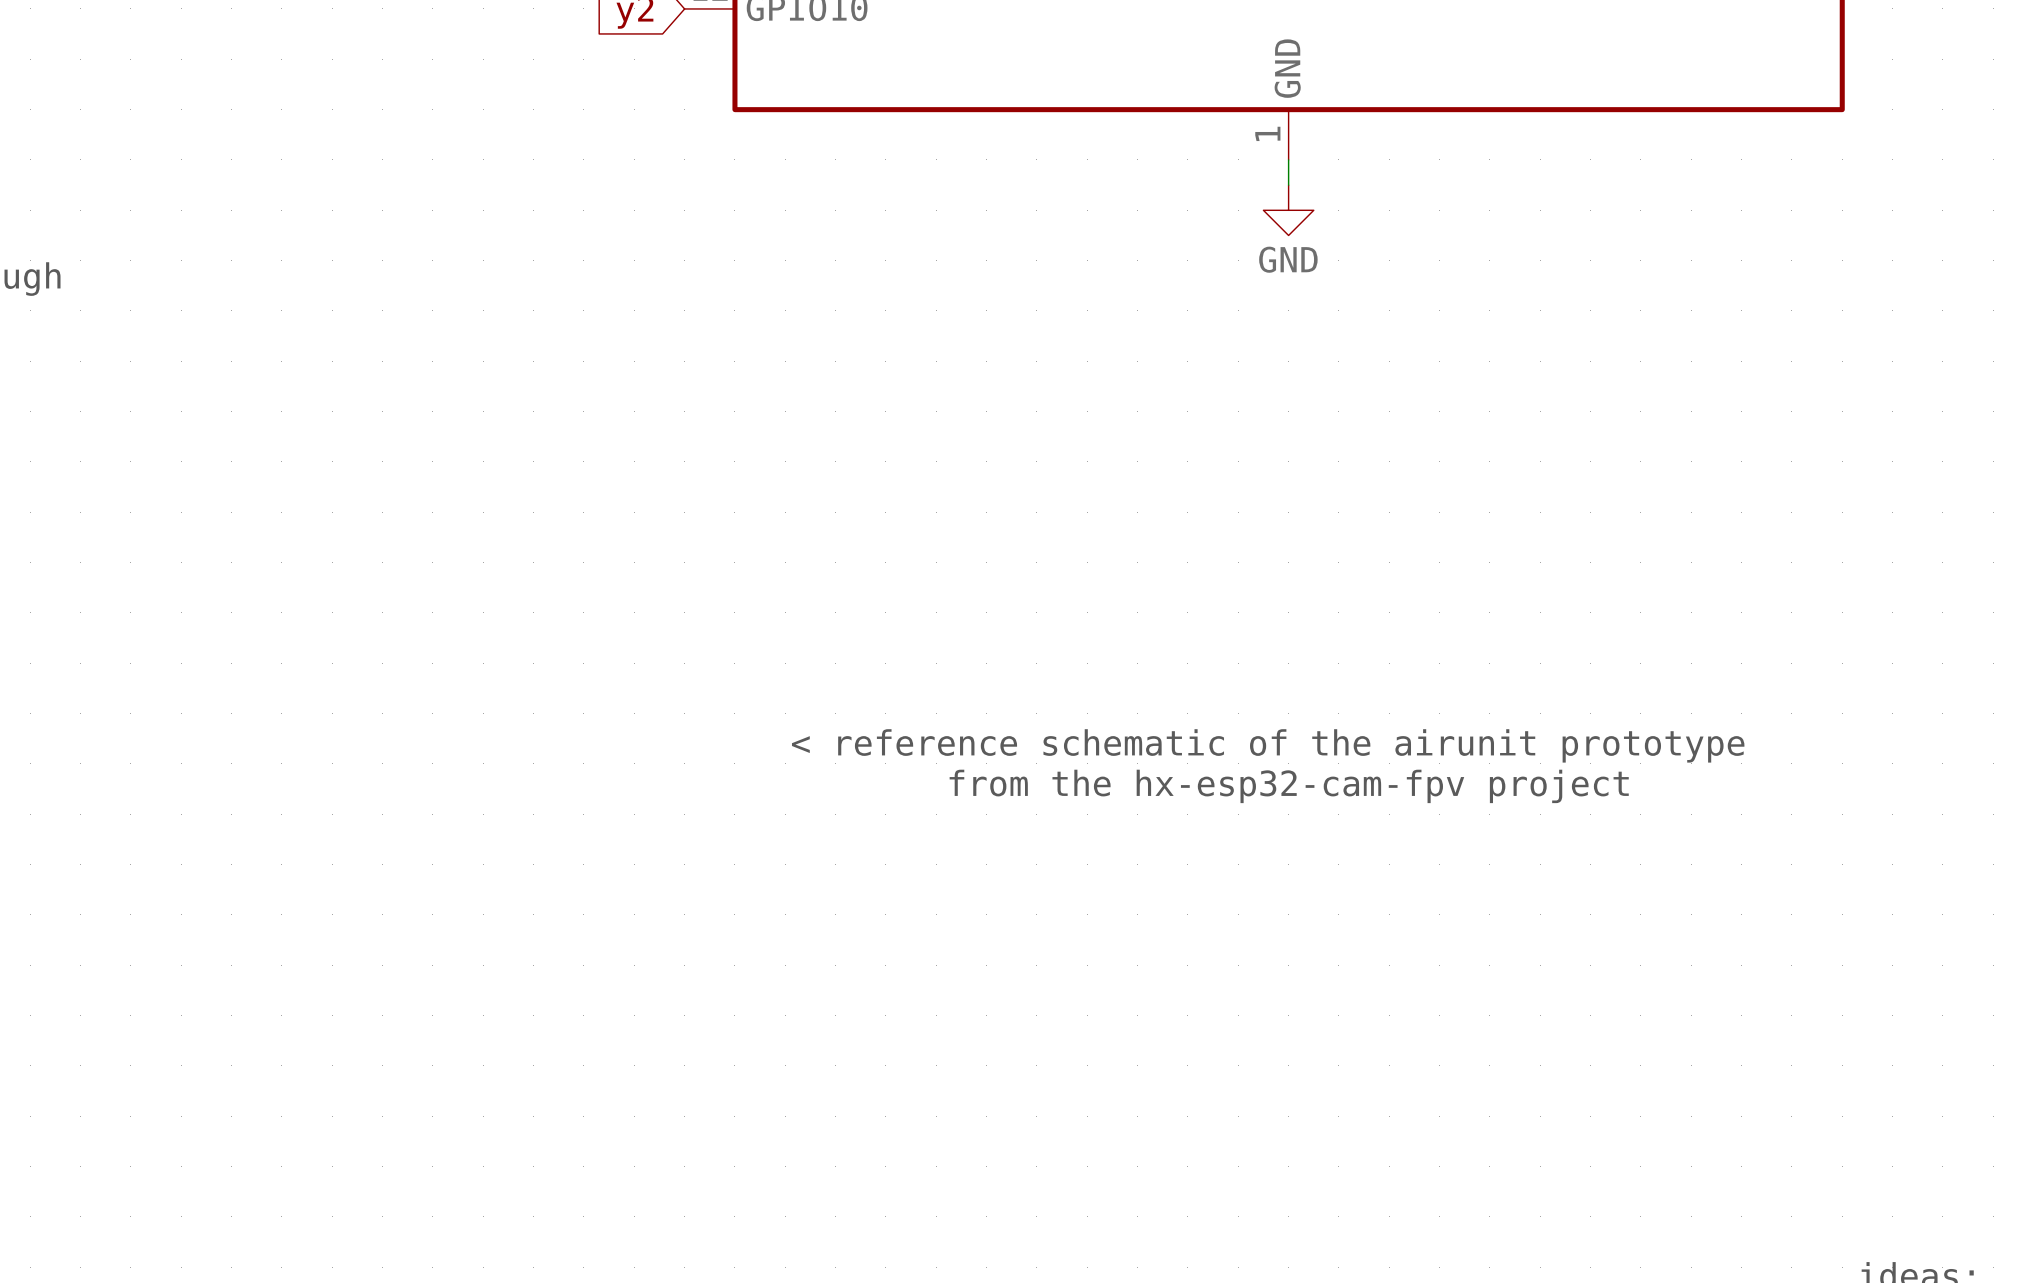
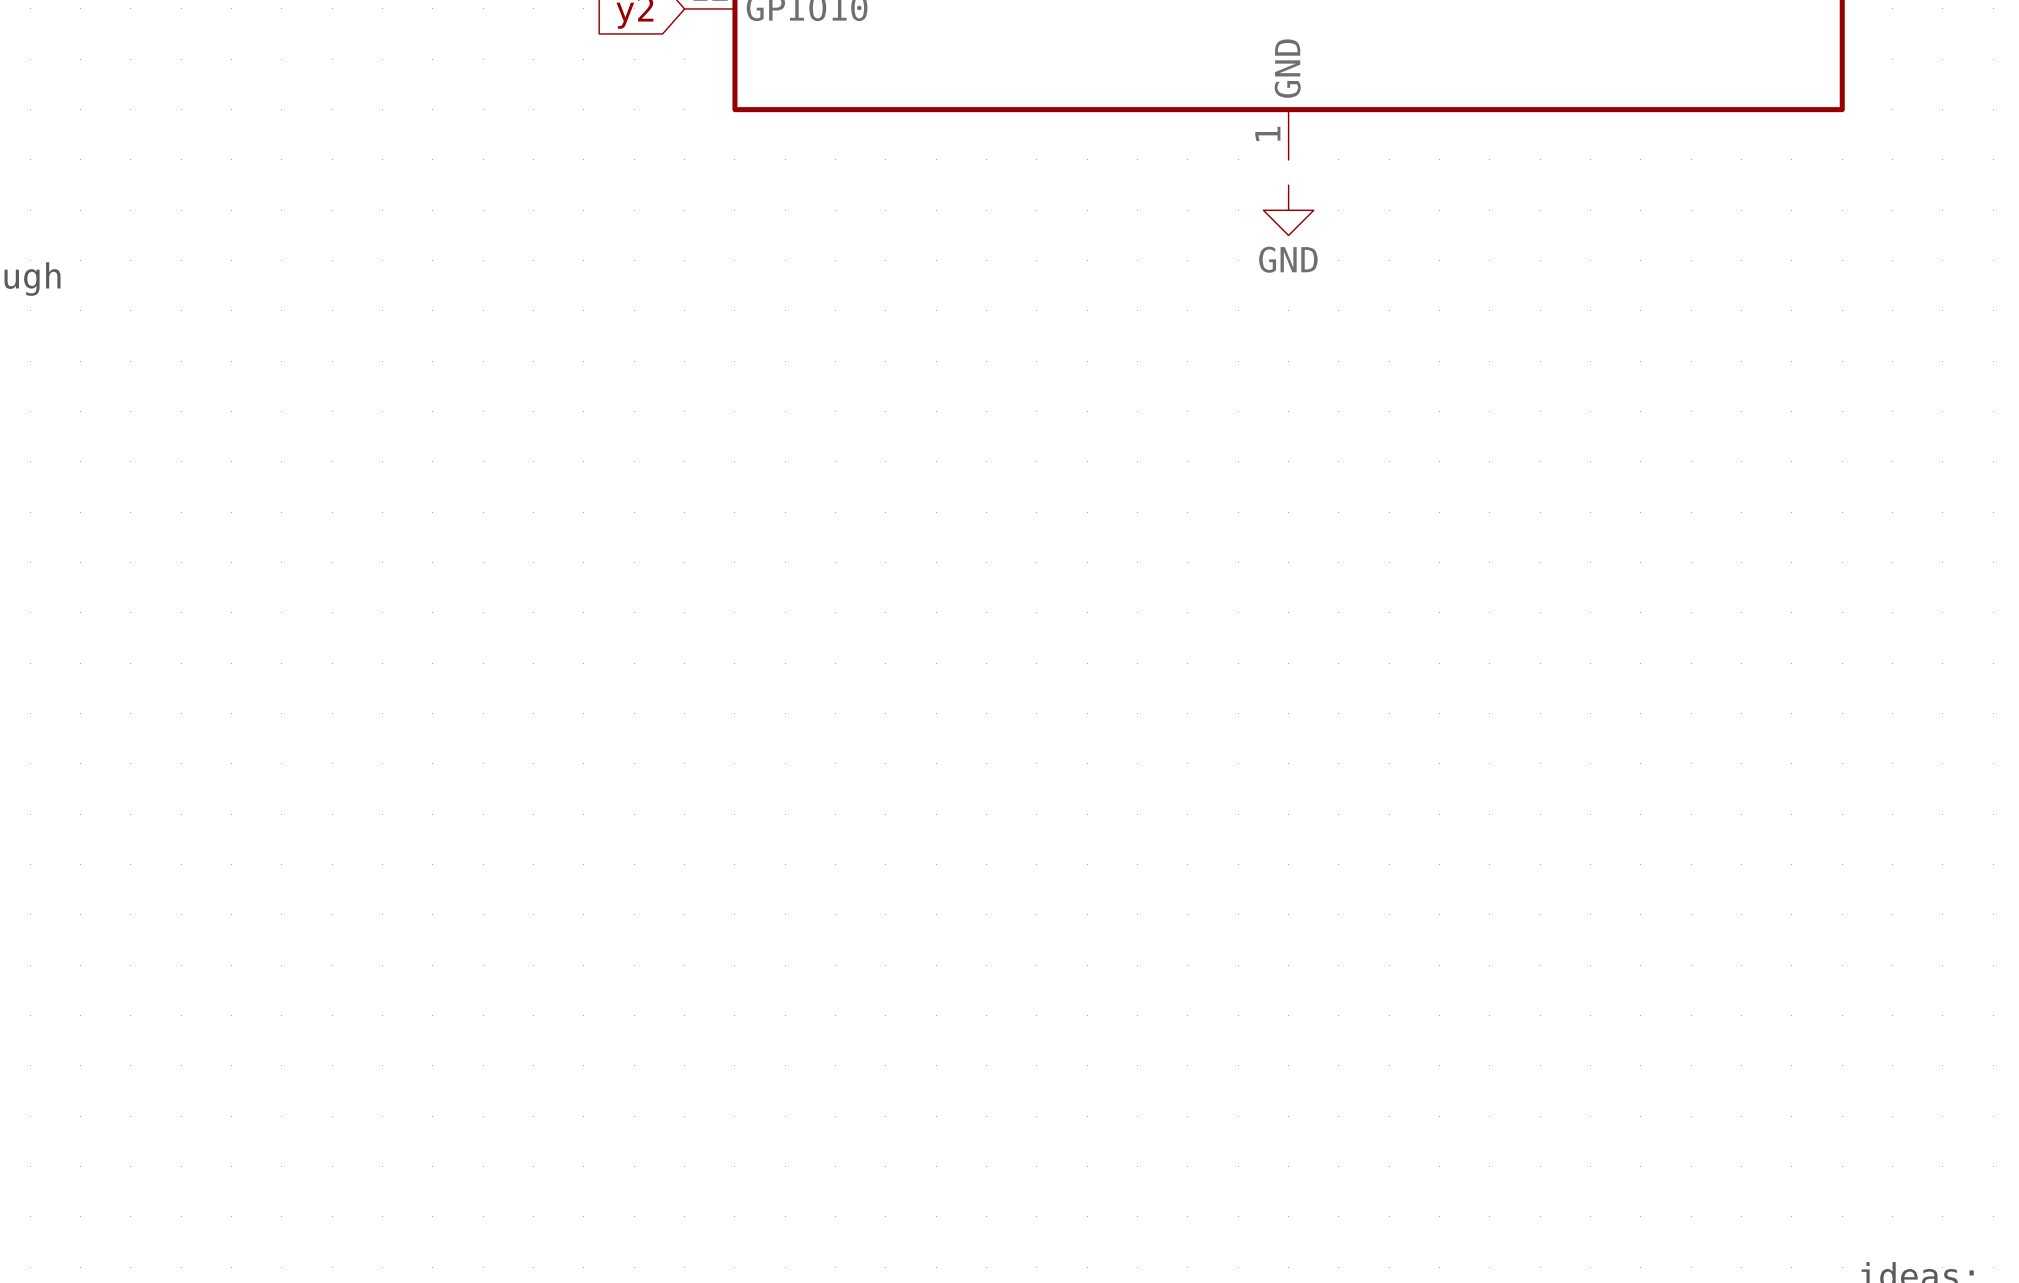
wire: (1288, 159) (1288, 185) -> none
text: < reference schematic of the airunit prototype (1268, 745) -> none
text: from the hx-esp32-cam-fpv project (1289, 786) -> none

